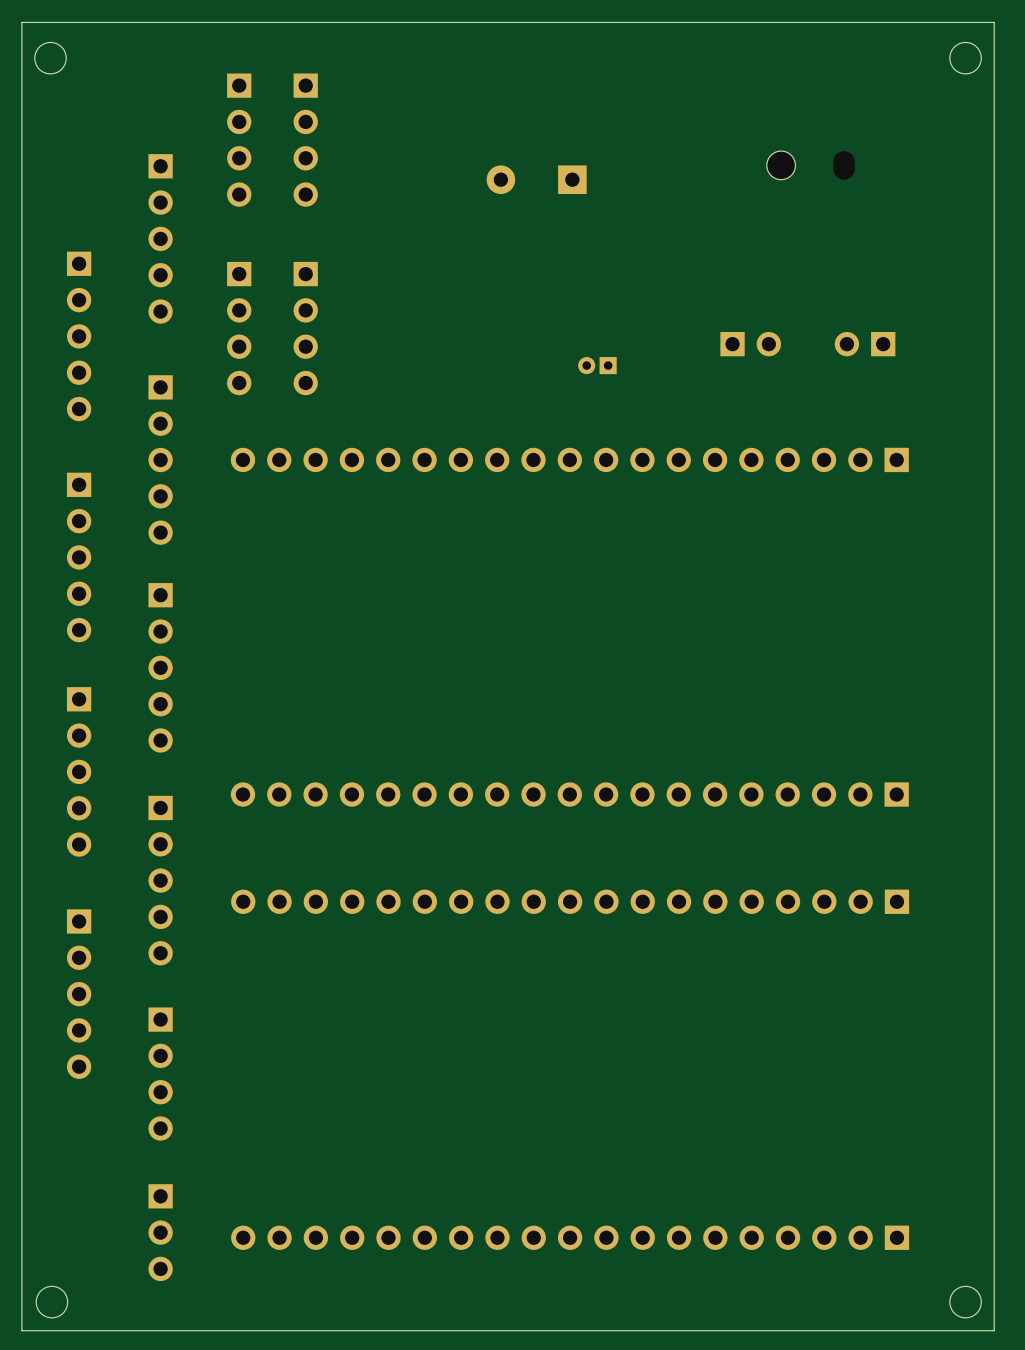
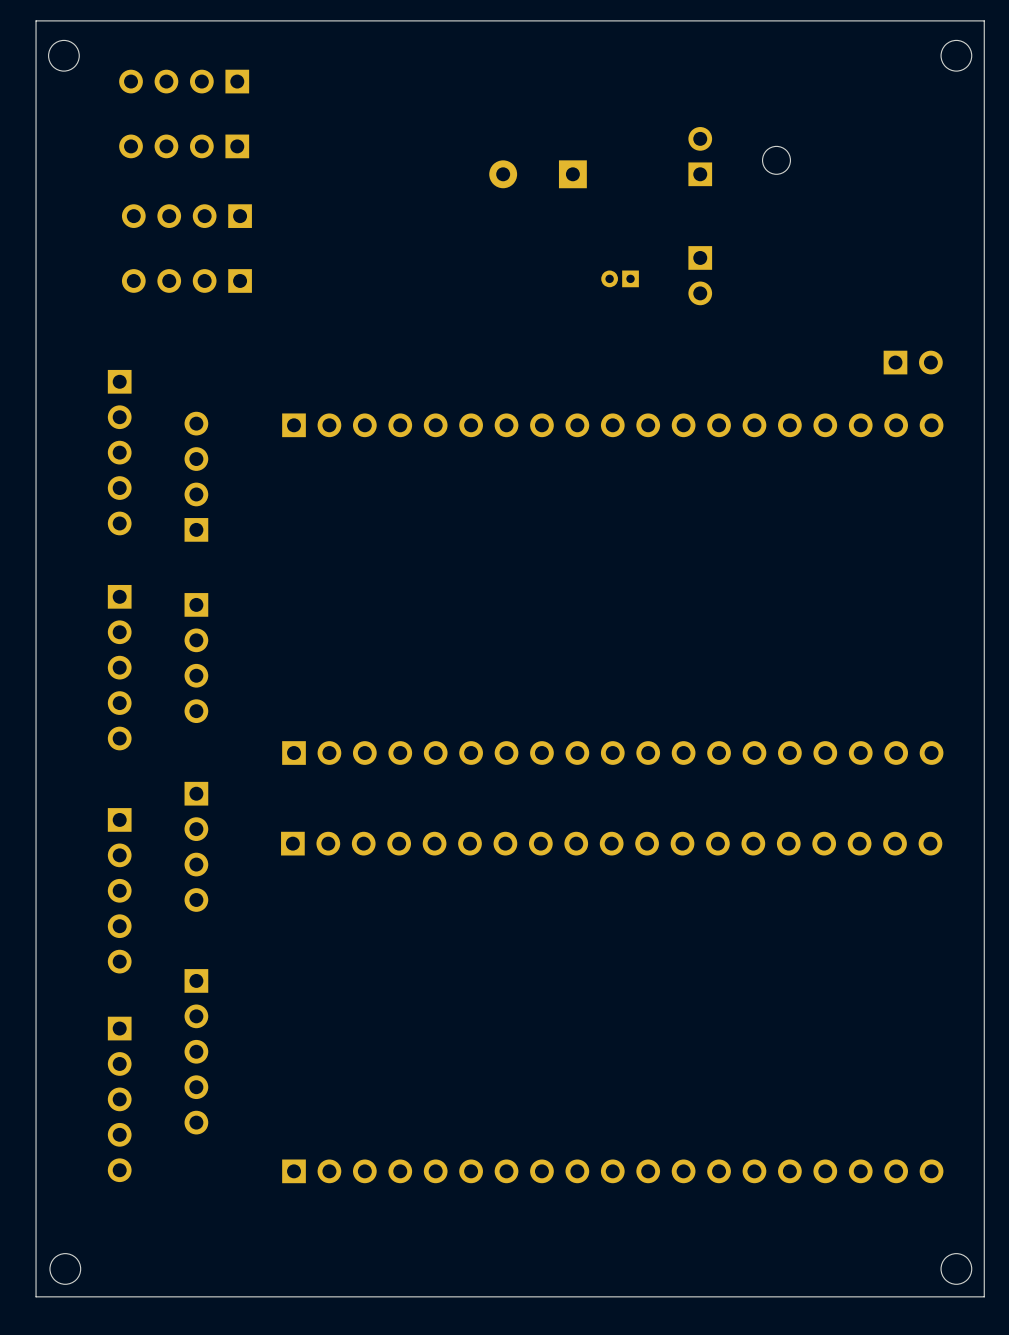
part: none -> (184, 81)
part: (239, 140) -> none
part: (305, 140) -> none
part: none -> (184, 146)
part: none -> (700, 156)
part: none -> (186, 216)
part: (160, 238) -> none
part: none -> (186, 280)
part: (239, 328) -> none
part: (305, 328) -> none
part: (79, 336) -> none
part rotation: 0° (750, 344) -> 90° clockwise (700, 275)
part position: (750, 344) -> (700, 275)
part rotation: 0° (865, 344) -> 180° (913, 362)
part position: (865, 344) -> (913, 362)
part position: (597, 365) -> (620, 278)
part rotation: 0° (569, 459) -> 180° (612, 425)
part: (160, 460) -> none
part: none -> (119, 452)
part: none -> (196, 476)
part: (79, 557) -> none
part: (160, 667) -> none
part: none -> (196, 658)
part: none -> (119, 667)
part: (79, 771) -> none
part: none -> (612, 753)
part: (569, 794) -> none
part: none -> (611, 843)
part: none -> (196, 846)
part: (160, 880) -> none
part: (570, 901) -> none
part: none -> (119, 890)
part: (79, 994) -> none
part: (160, 1074) -> none
part: none -> (196, 1051)
part: none -> (119, 1099)
part: (160, 1232) -> none
part rotation: 0° (570, 1237) -> 180° (612, 1171)

